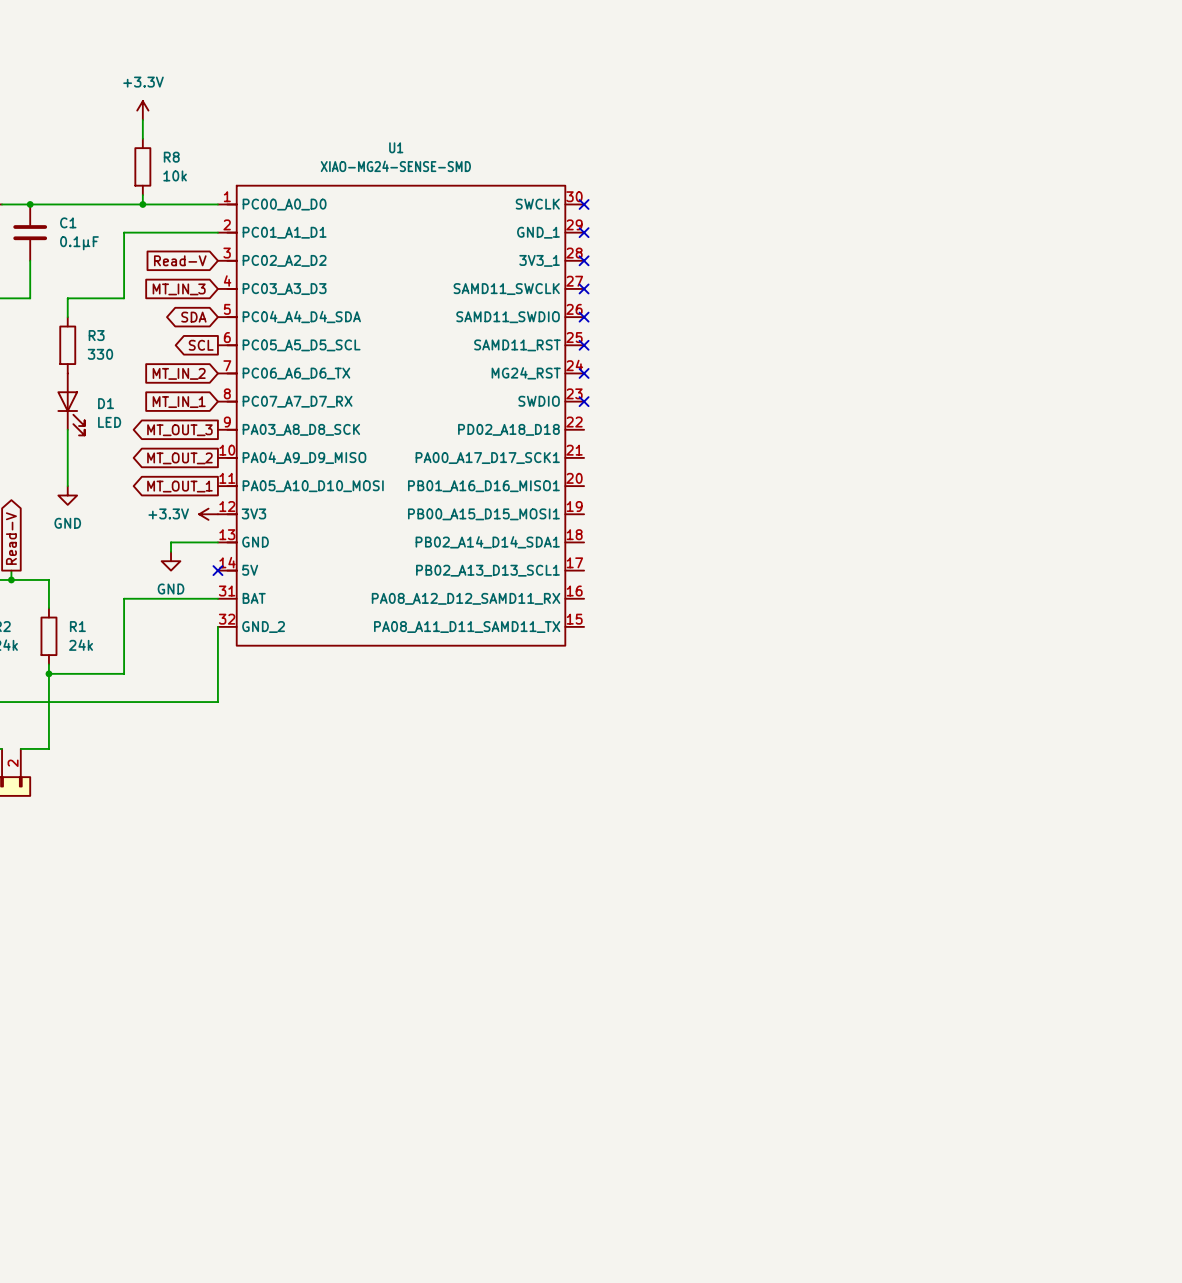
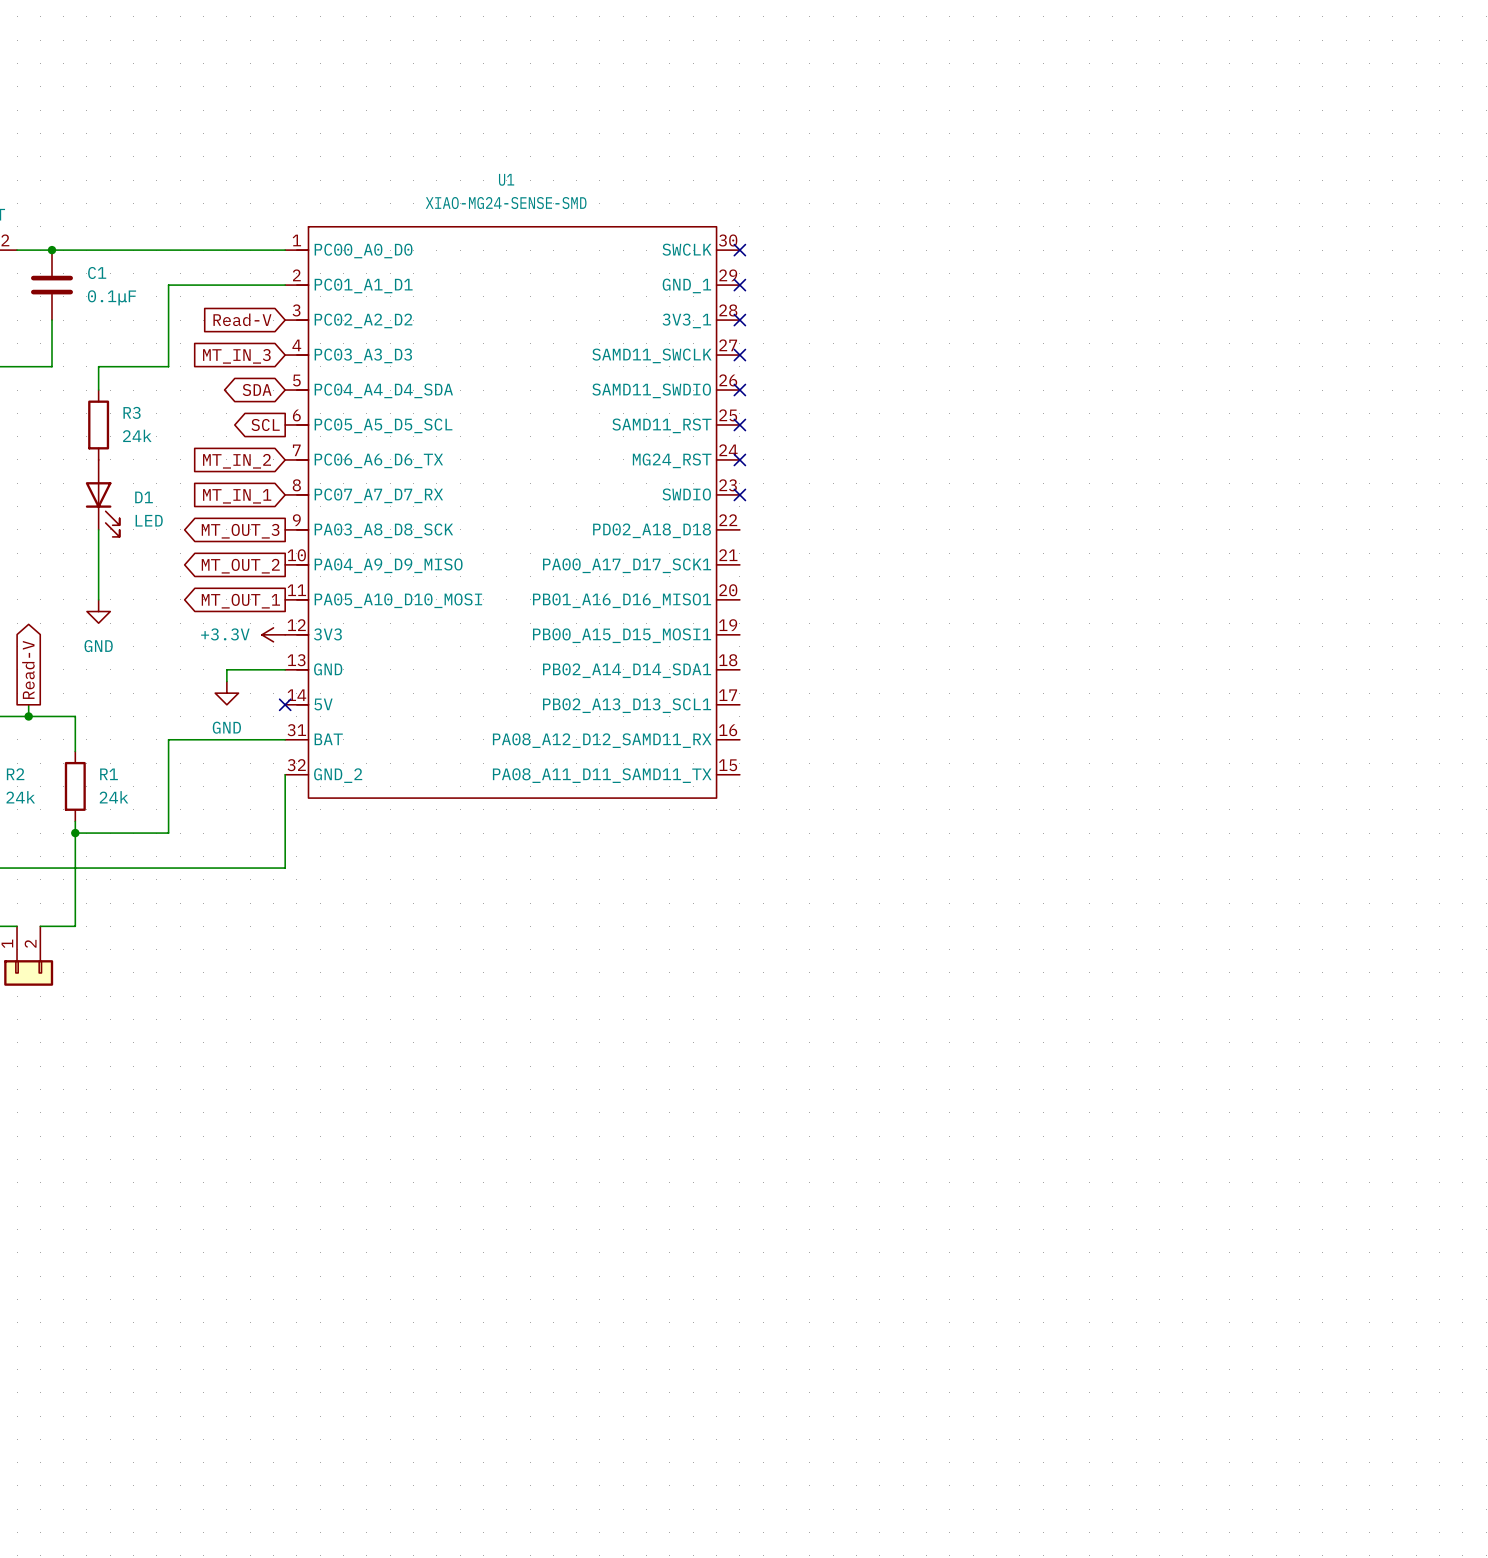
power symbol: +3.3V (142, 110) -> none
wire: (142, 119) (142, 138) -> none
R8: 10k (142, 166) -> none
wire: (142, 195) (142, 204) -> none
junction: (142, 204) -> none
R3 value: 330 (100, 354) -> 24k (137, 435)

